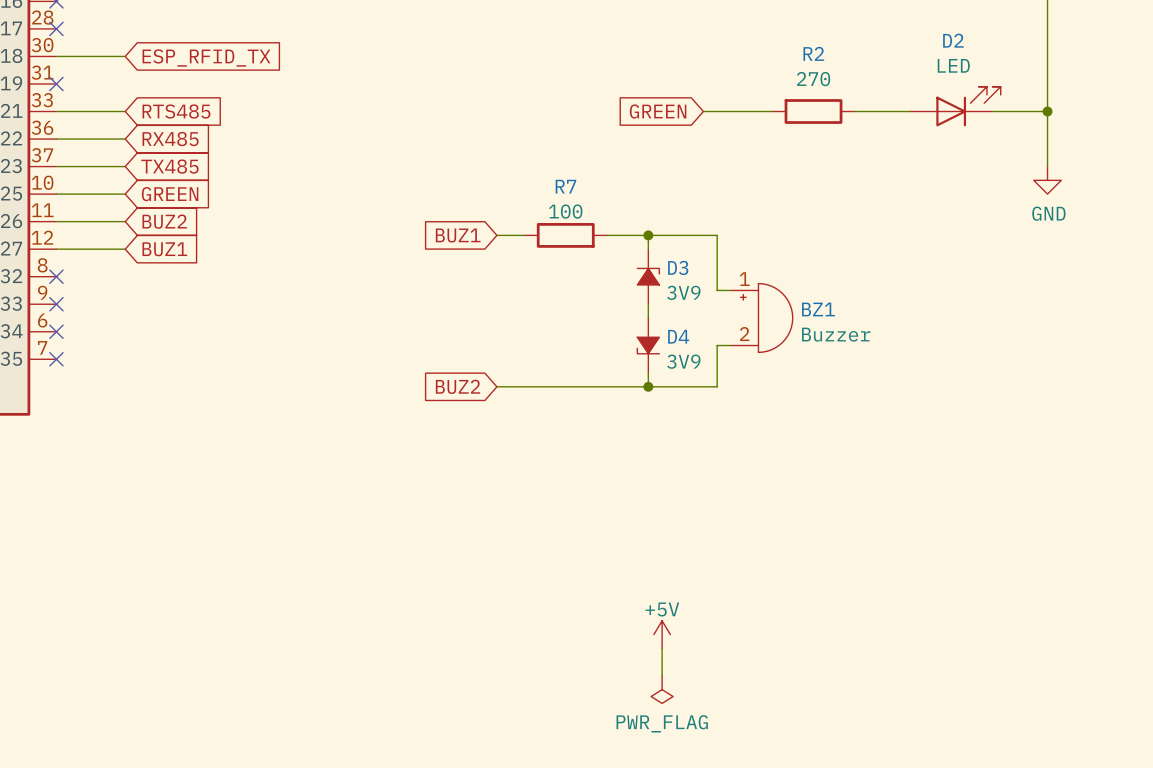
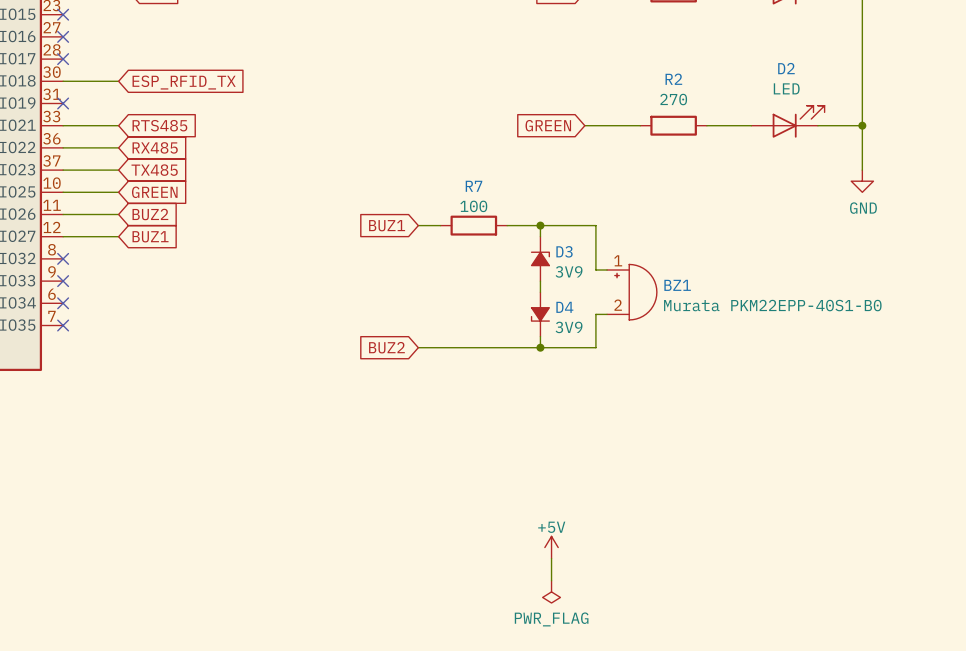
BZ1 value: Buzzer (836, 334) -> Murata PKM22EPP-40S1-B0 (772, 305)

